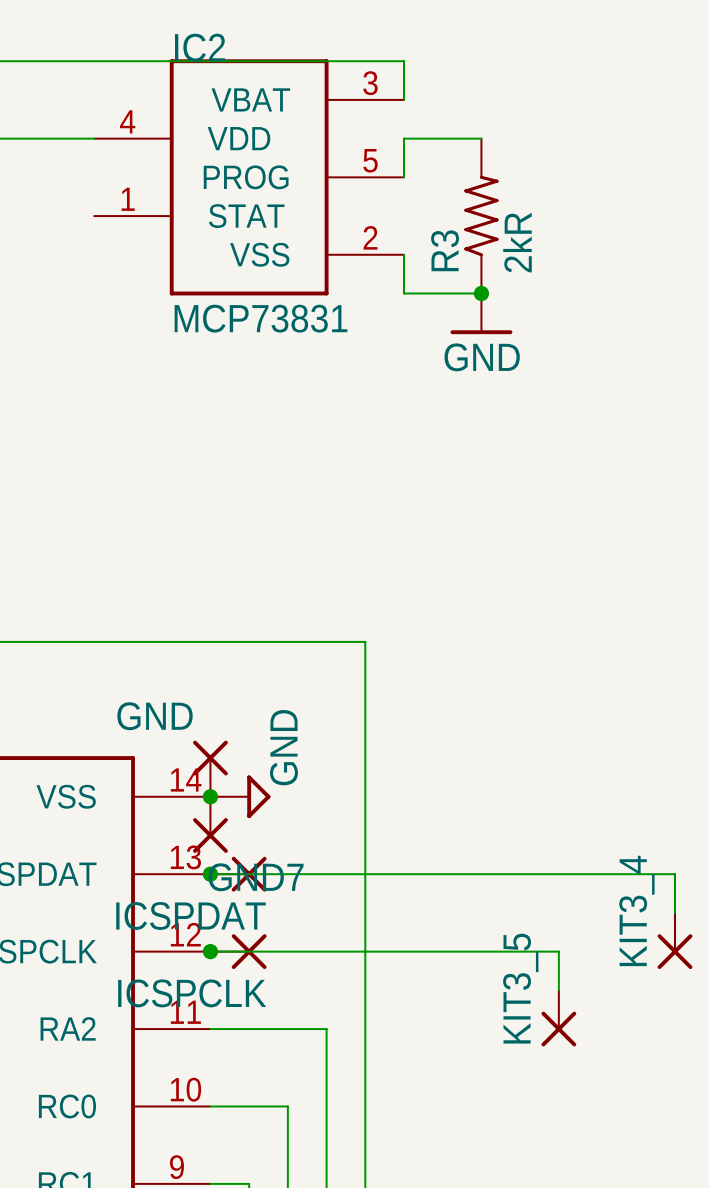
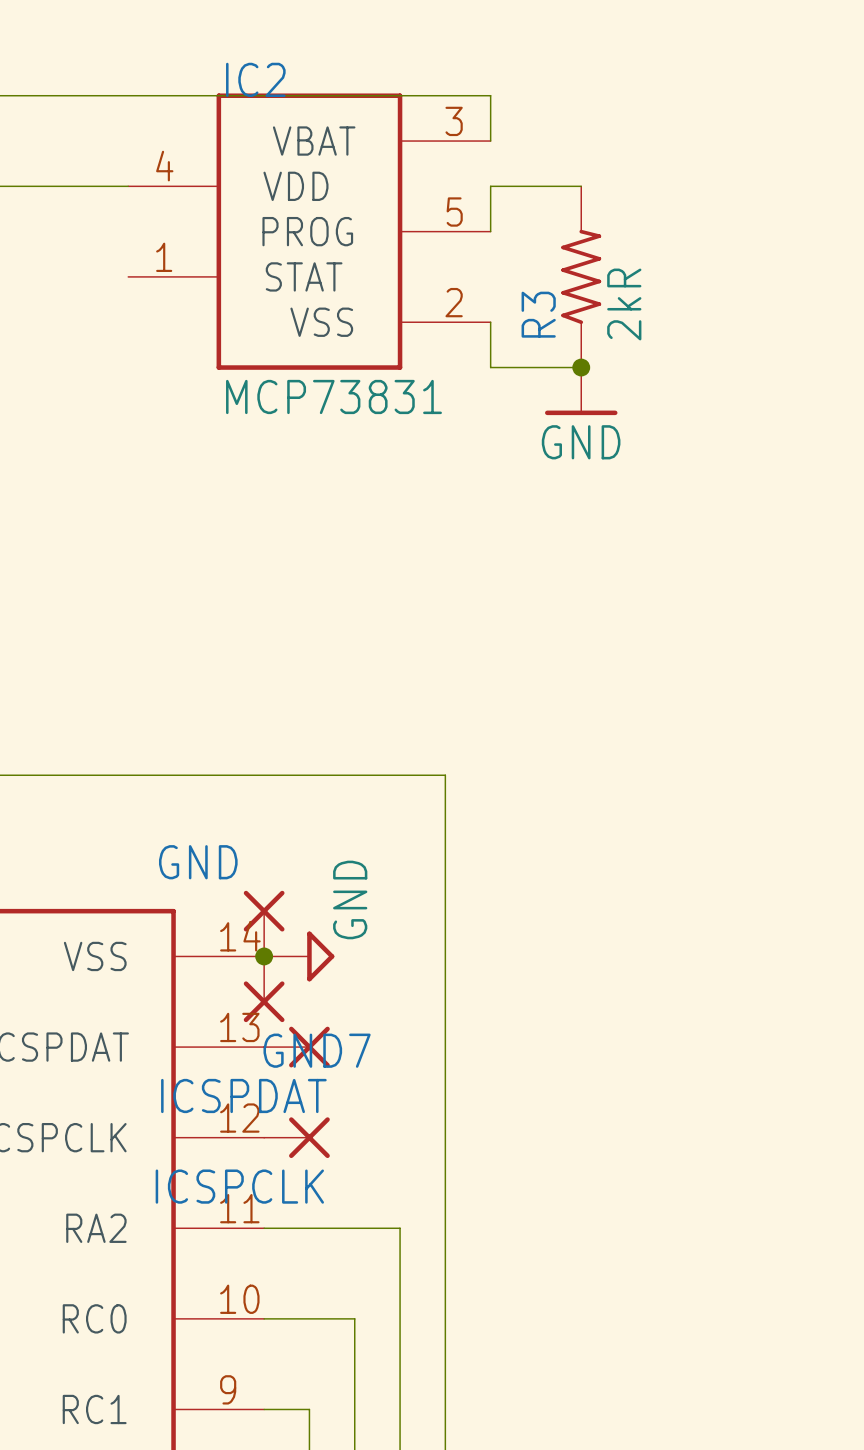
wire: (210, 874) (675, 874) (675, 912) -> none
junction: (210, 874) -> none
KIT3_4: (675, 940) -> none
wire: (210, 951) (558, 951) (558, 990) -> none
junction: (210, 951) -> none
KIT3_5: (558, 1018) -> none

